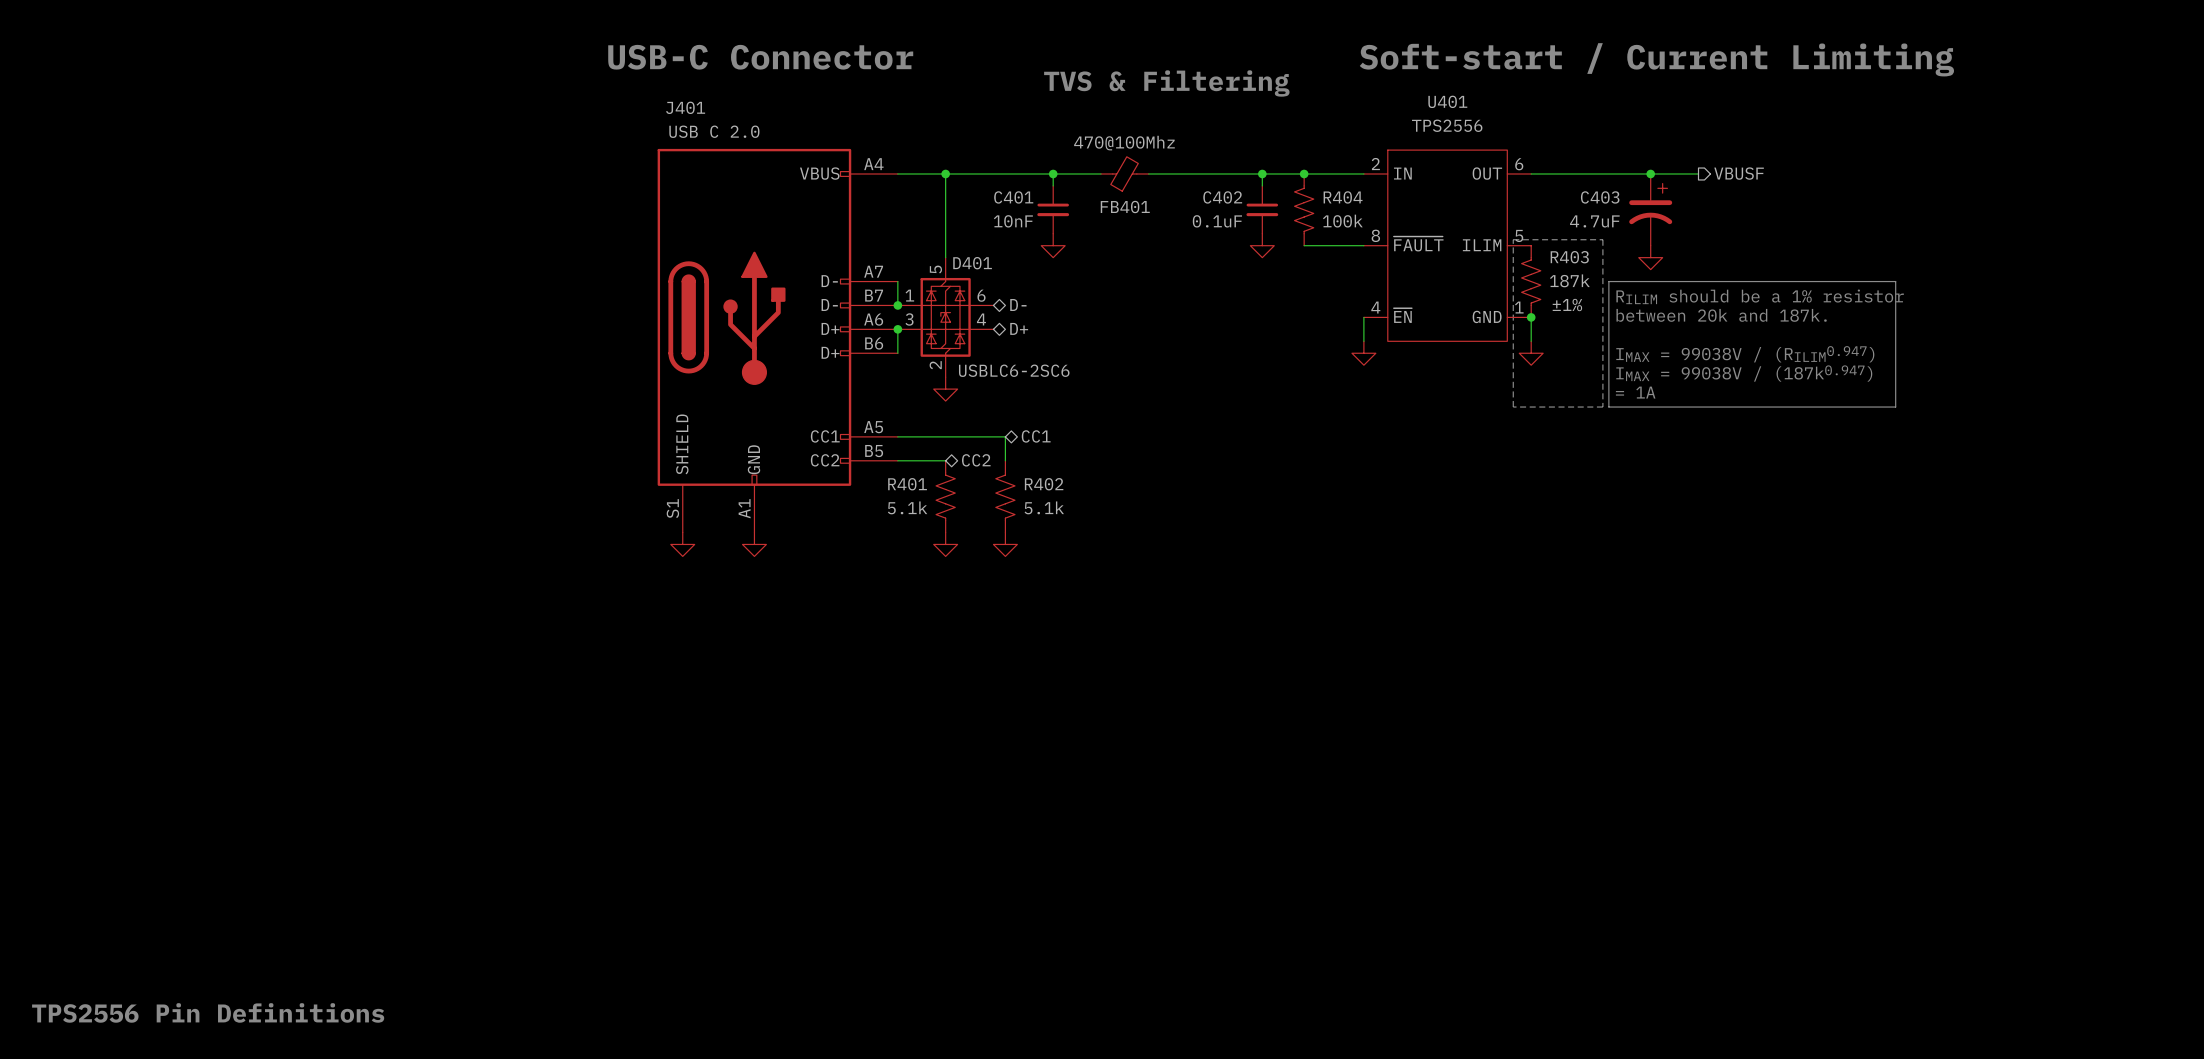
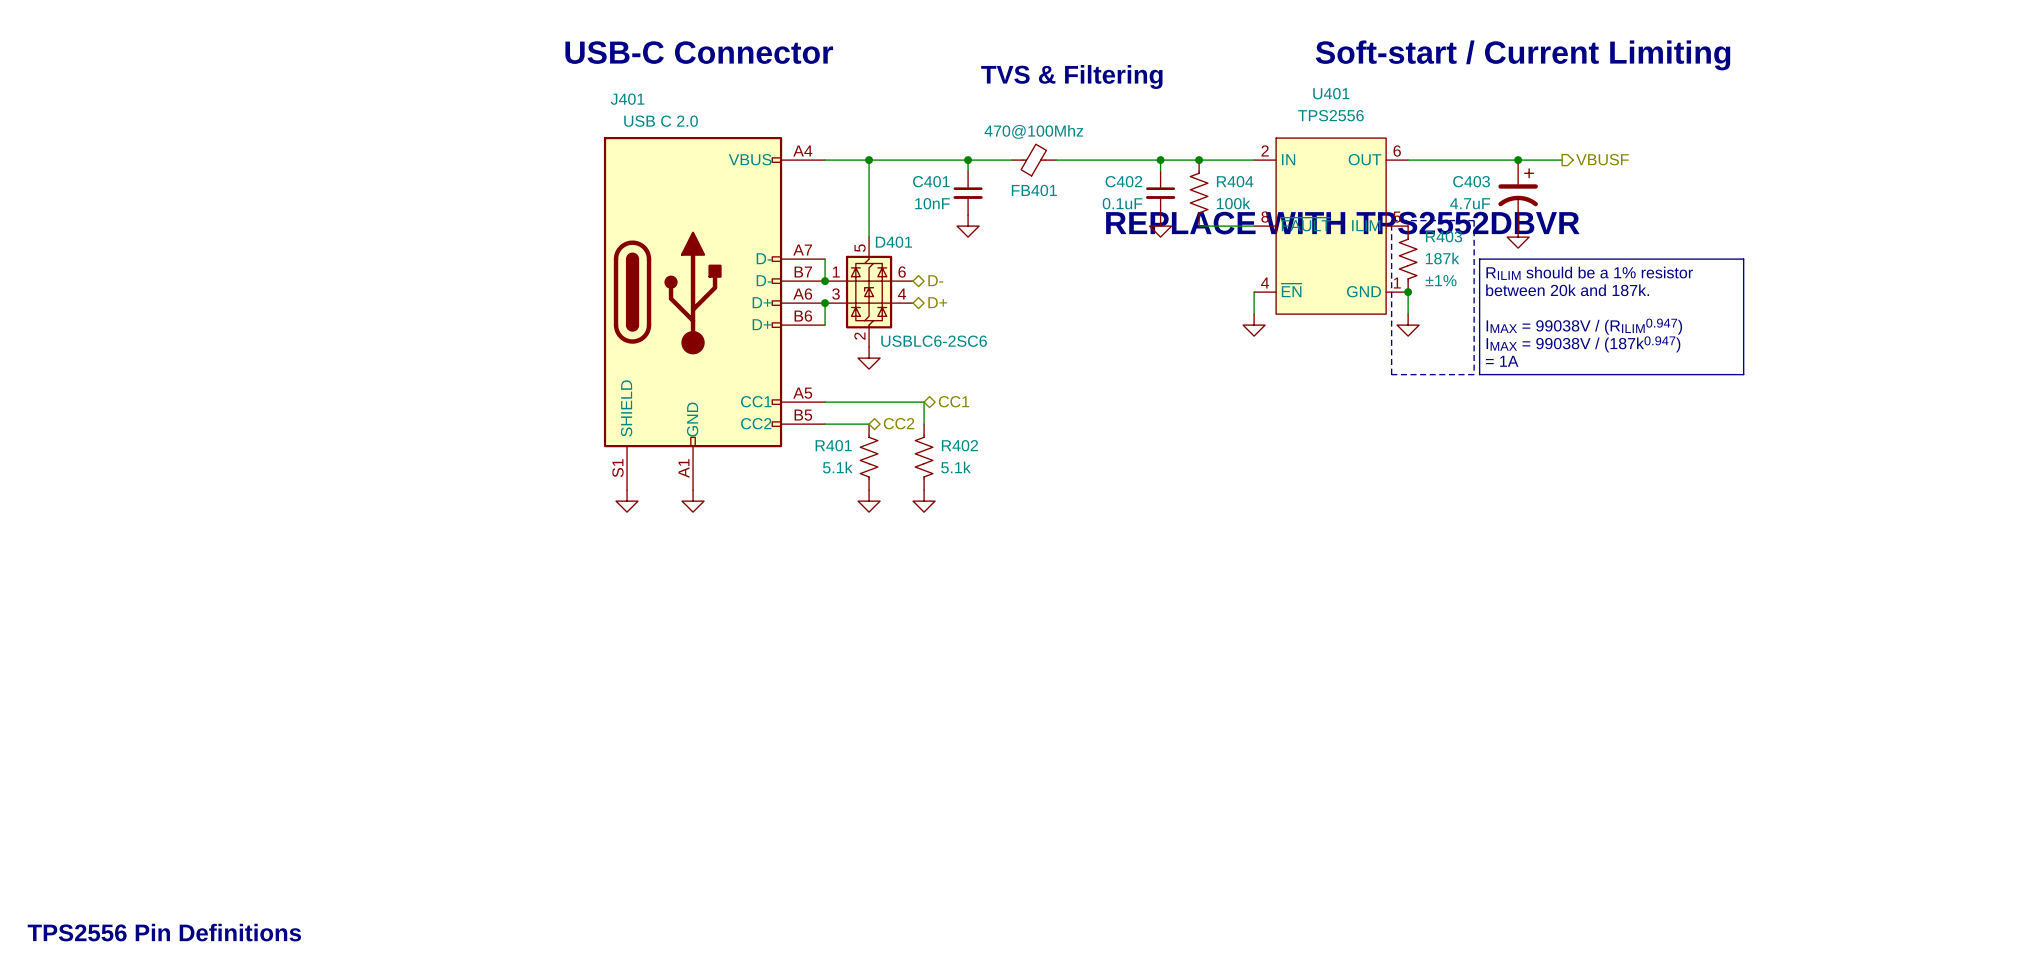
text: none -> REPLACE WITH TPS2552DBVR (1342, 223)

